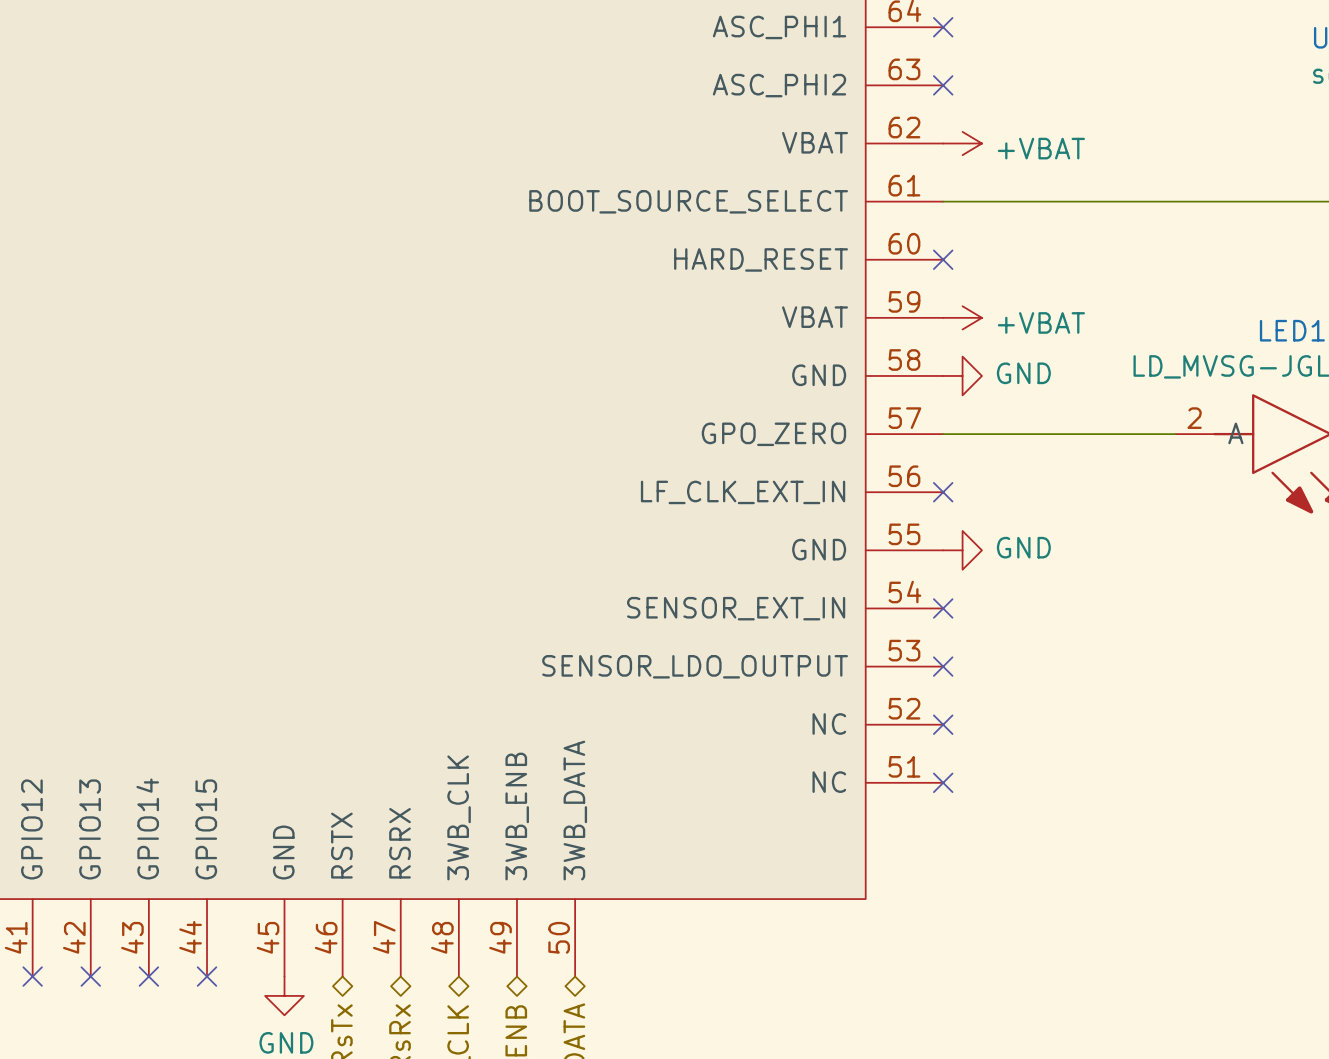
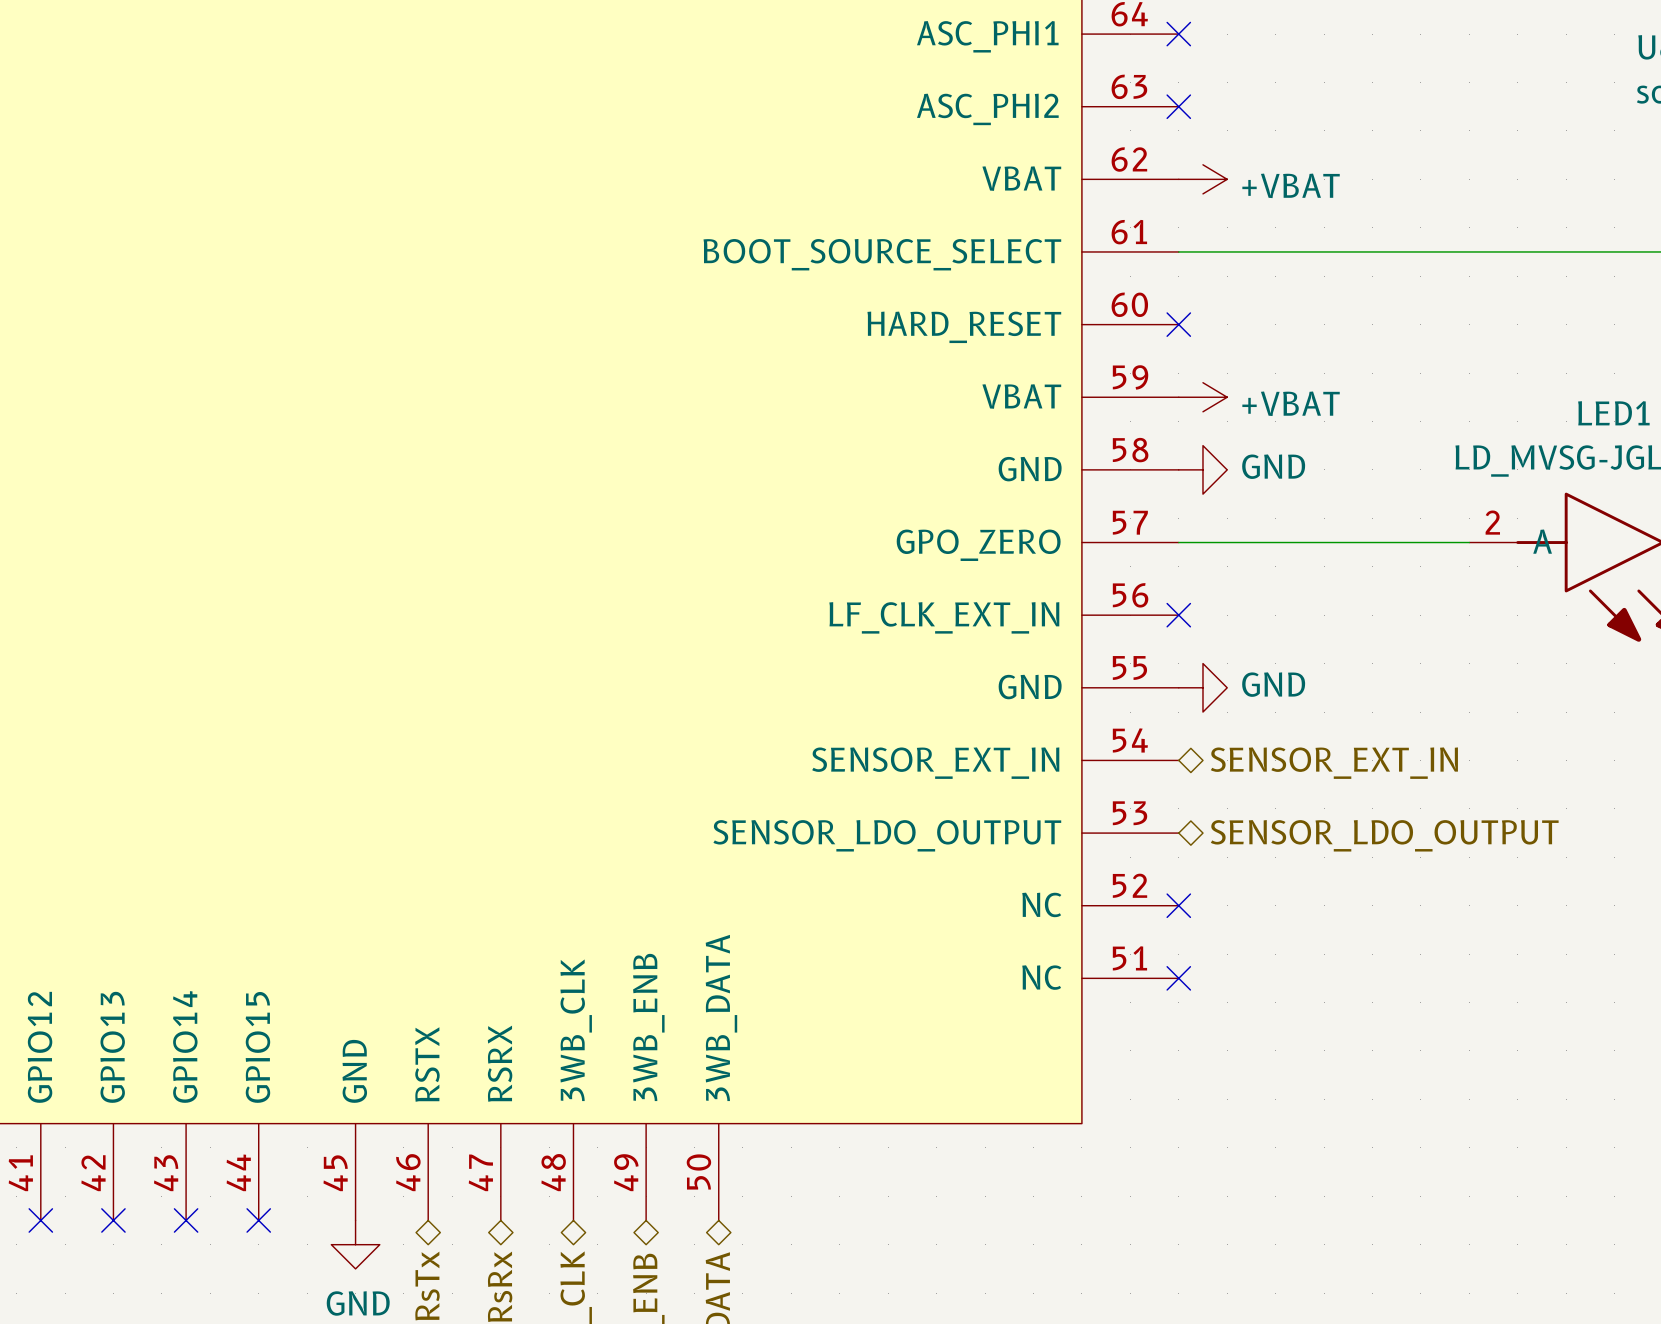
no-connect mark: (943, 608) -> none
hierarchical label: none -> SENSOR_EXT_IN (1334, 763)
no-connect mark: (943, 666) -> none
hierarchical label: none -> SENSOR_LDO_OUTPUT (1384, 835)

